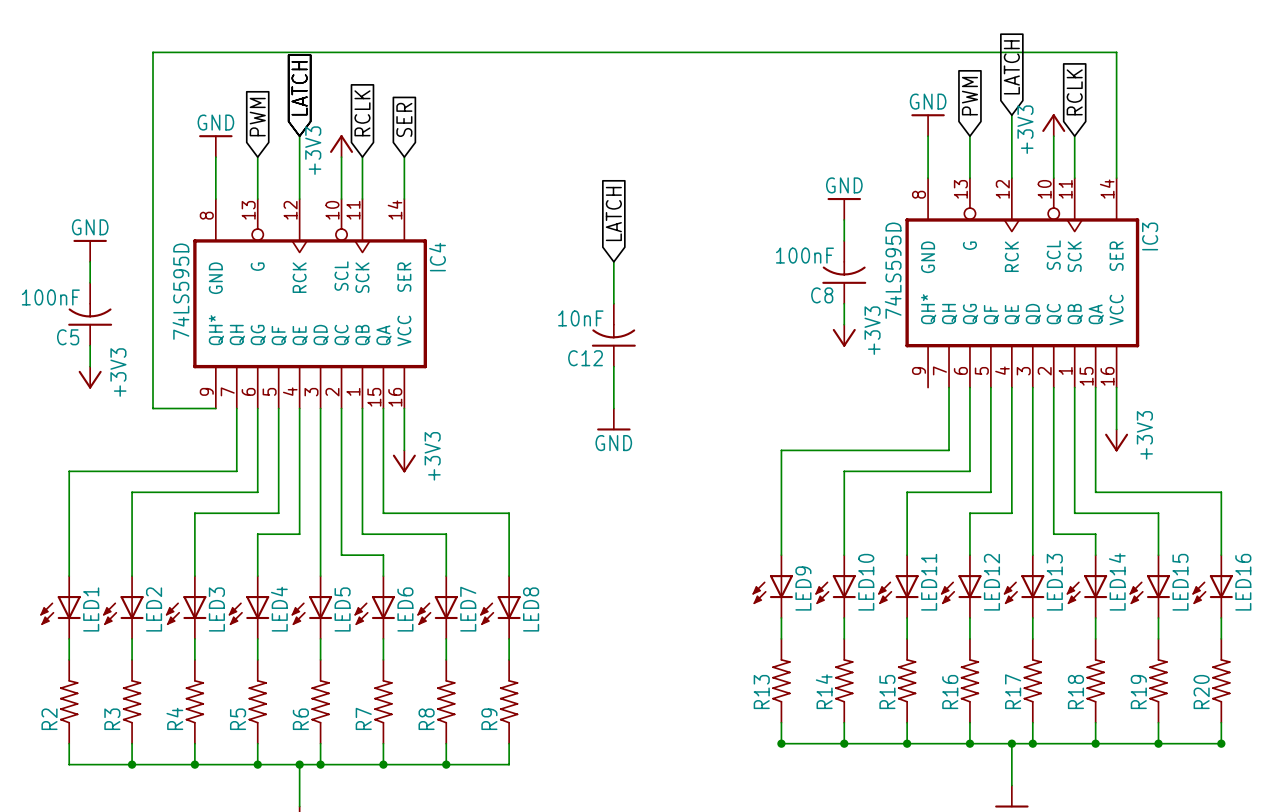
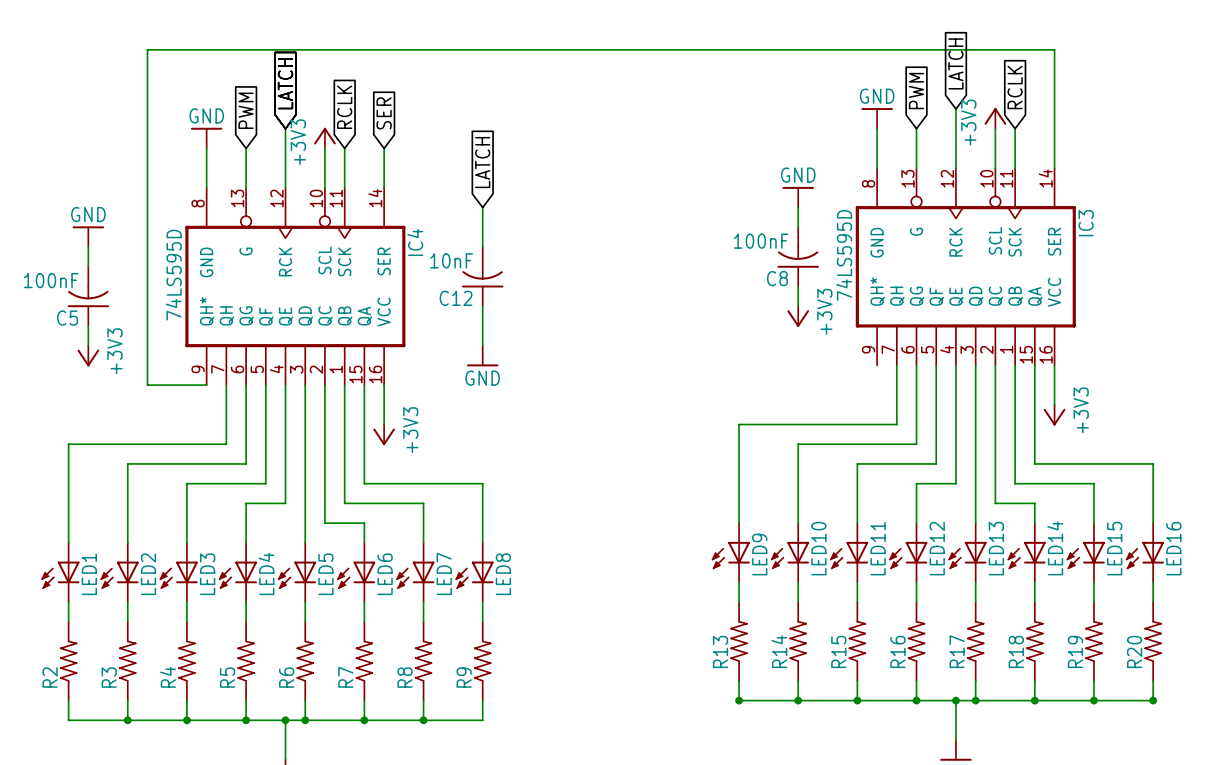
global label position: LATCH (613, 213) -> LATCH (482, 162)
wire: (613, 261) (613, 303) -> (482, 207) (482, 247)
C12 position: (613, 335) -> (482, 276)
wire: (613, 366) (613, 408) -> (482, 306) (482, 345)
power symbol position: GND (613, 419) -> GND (482, 356)

